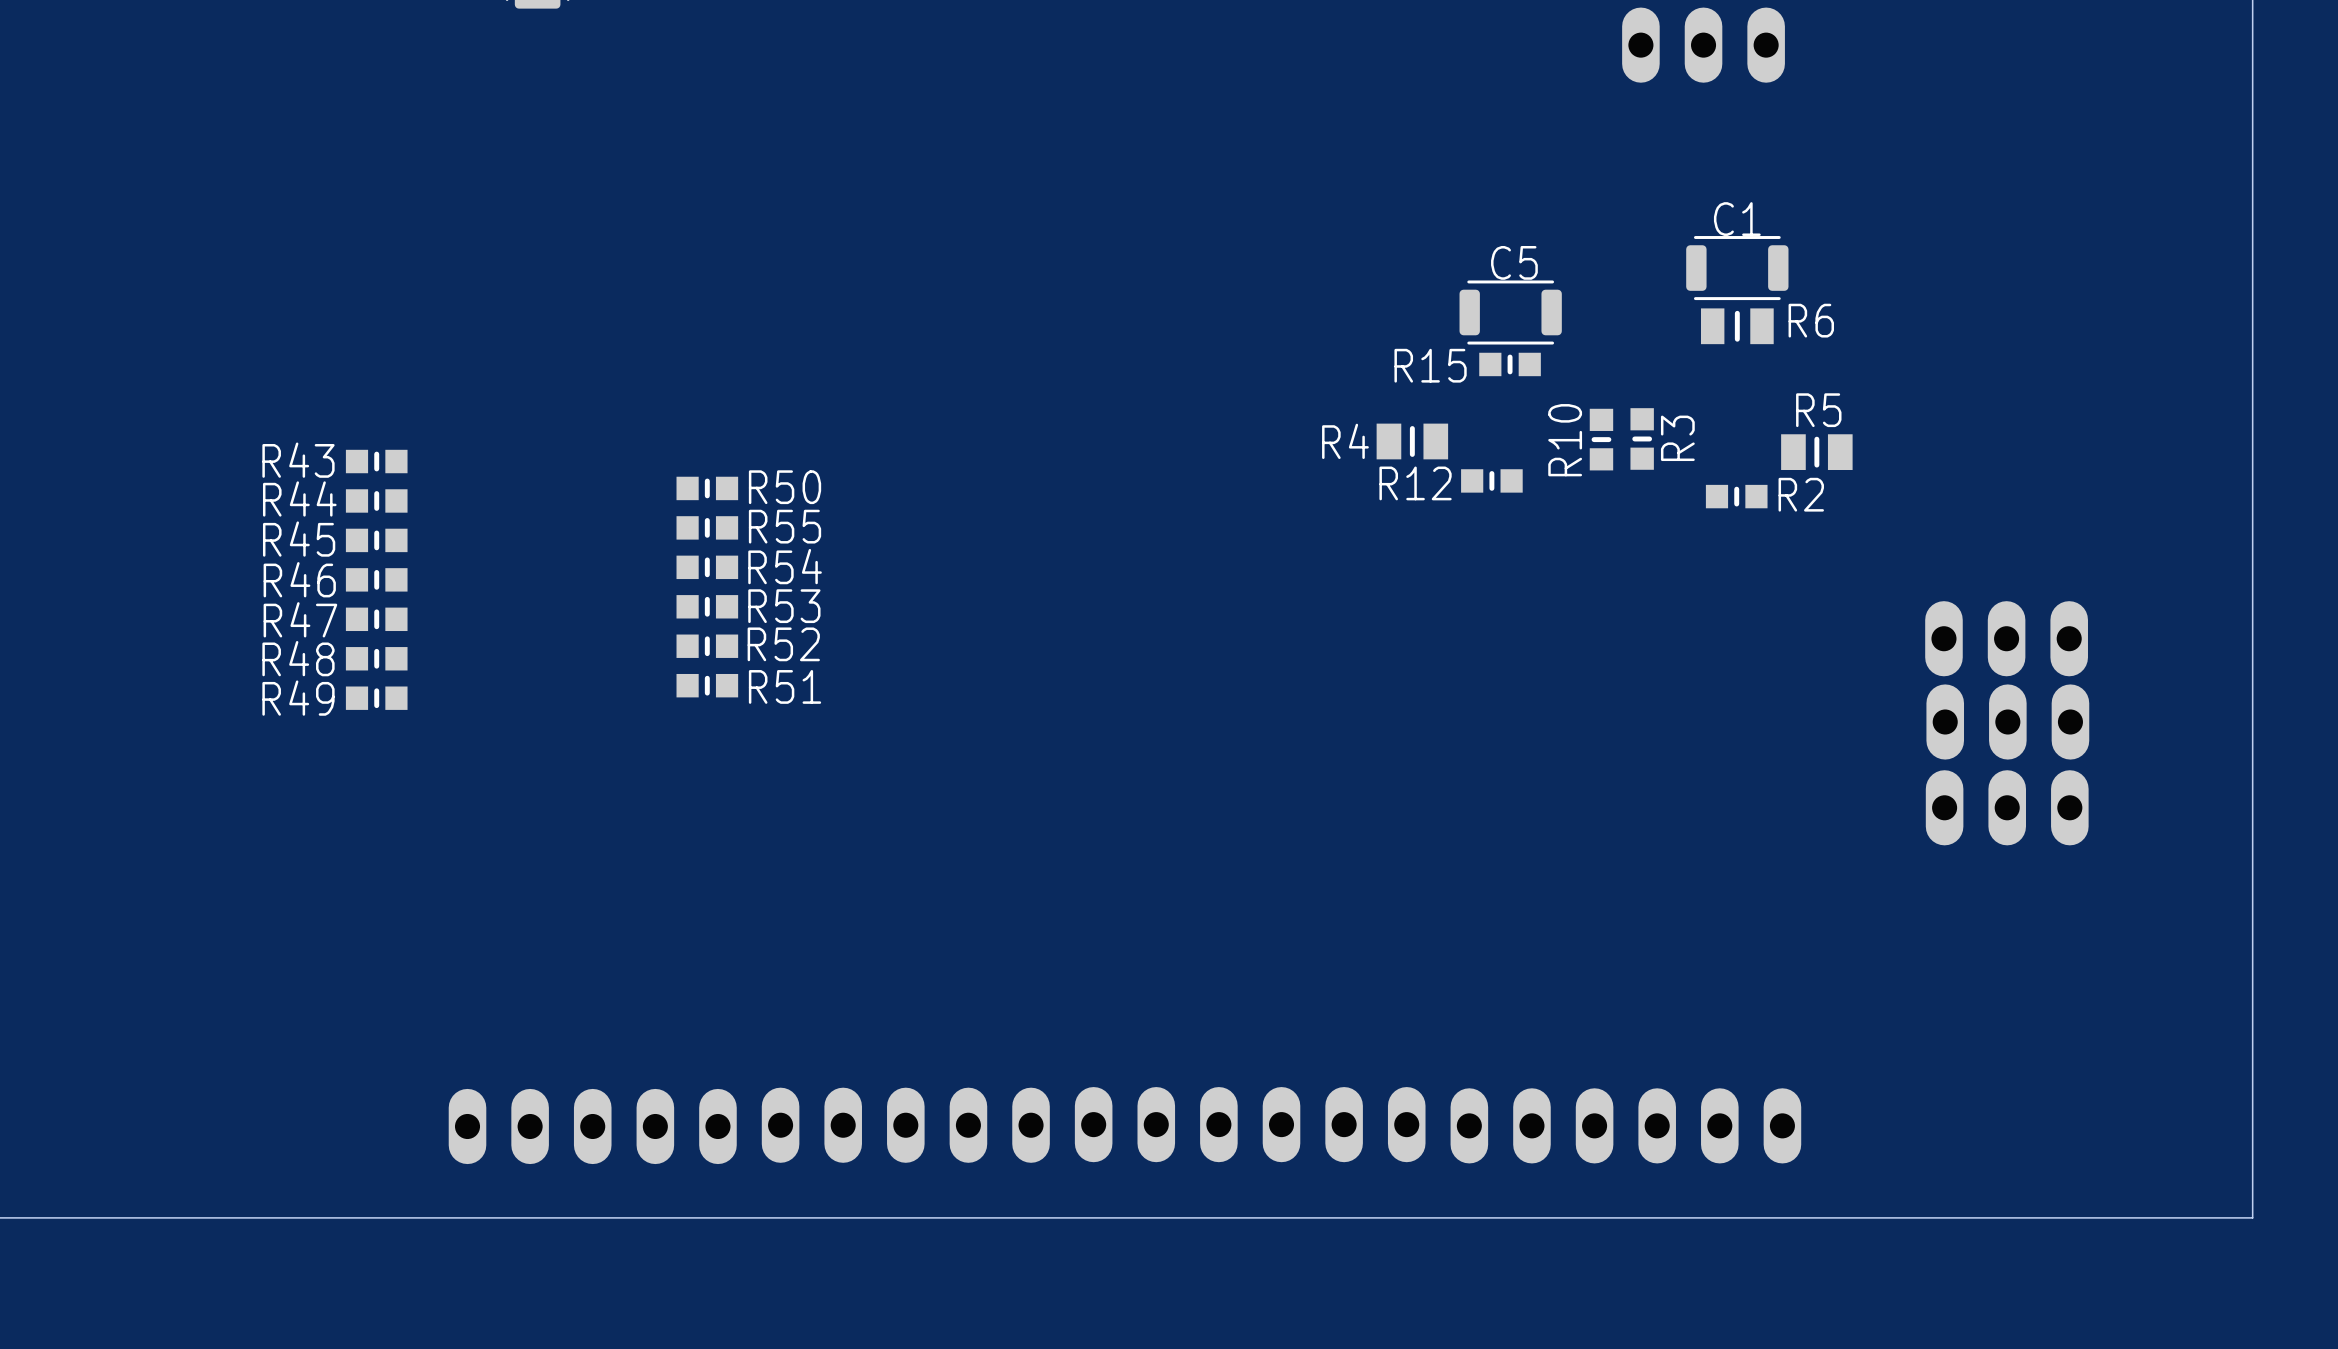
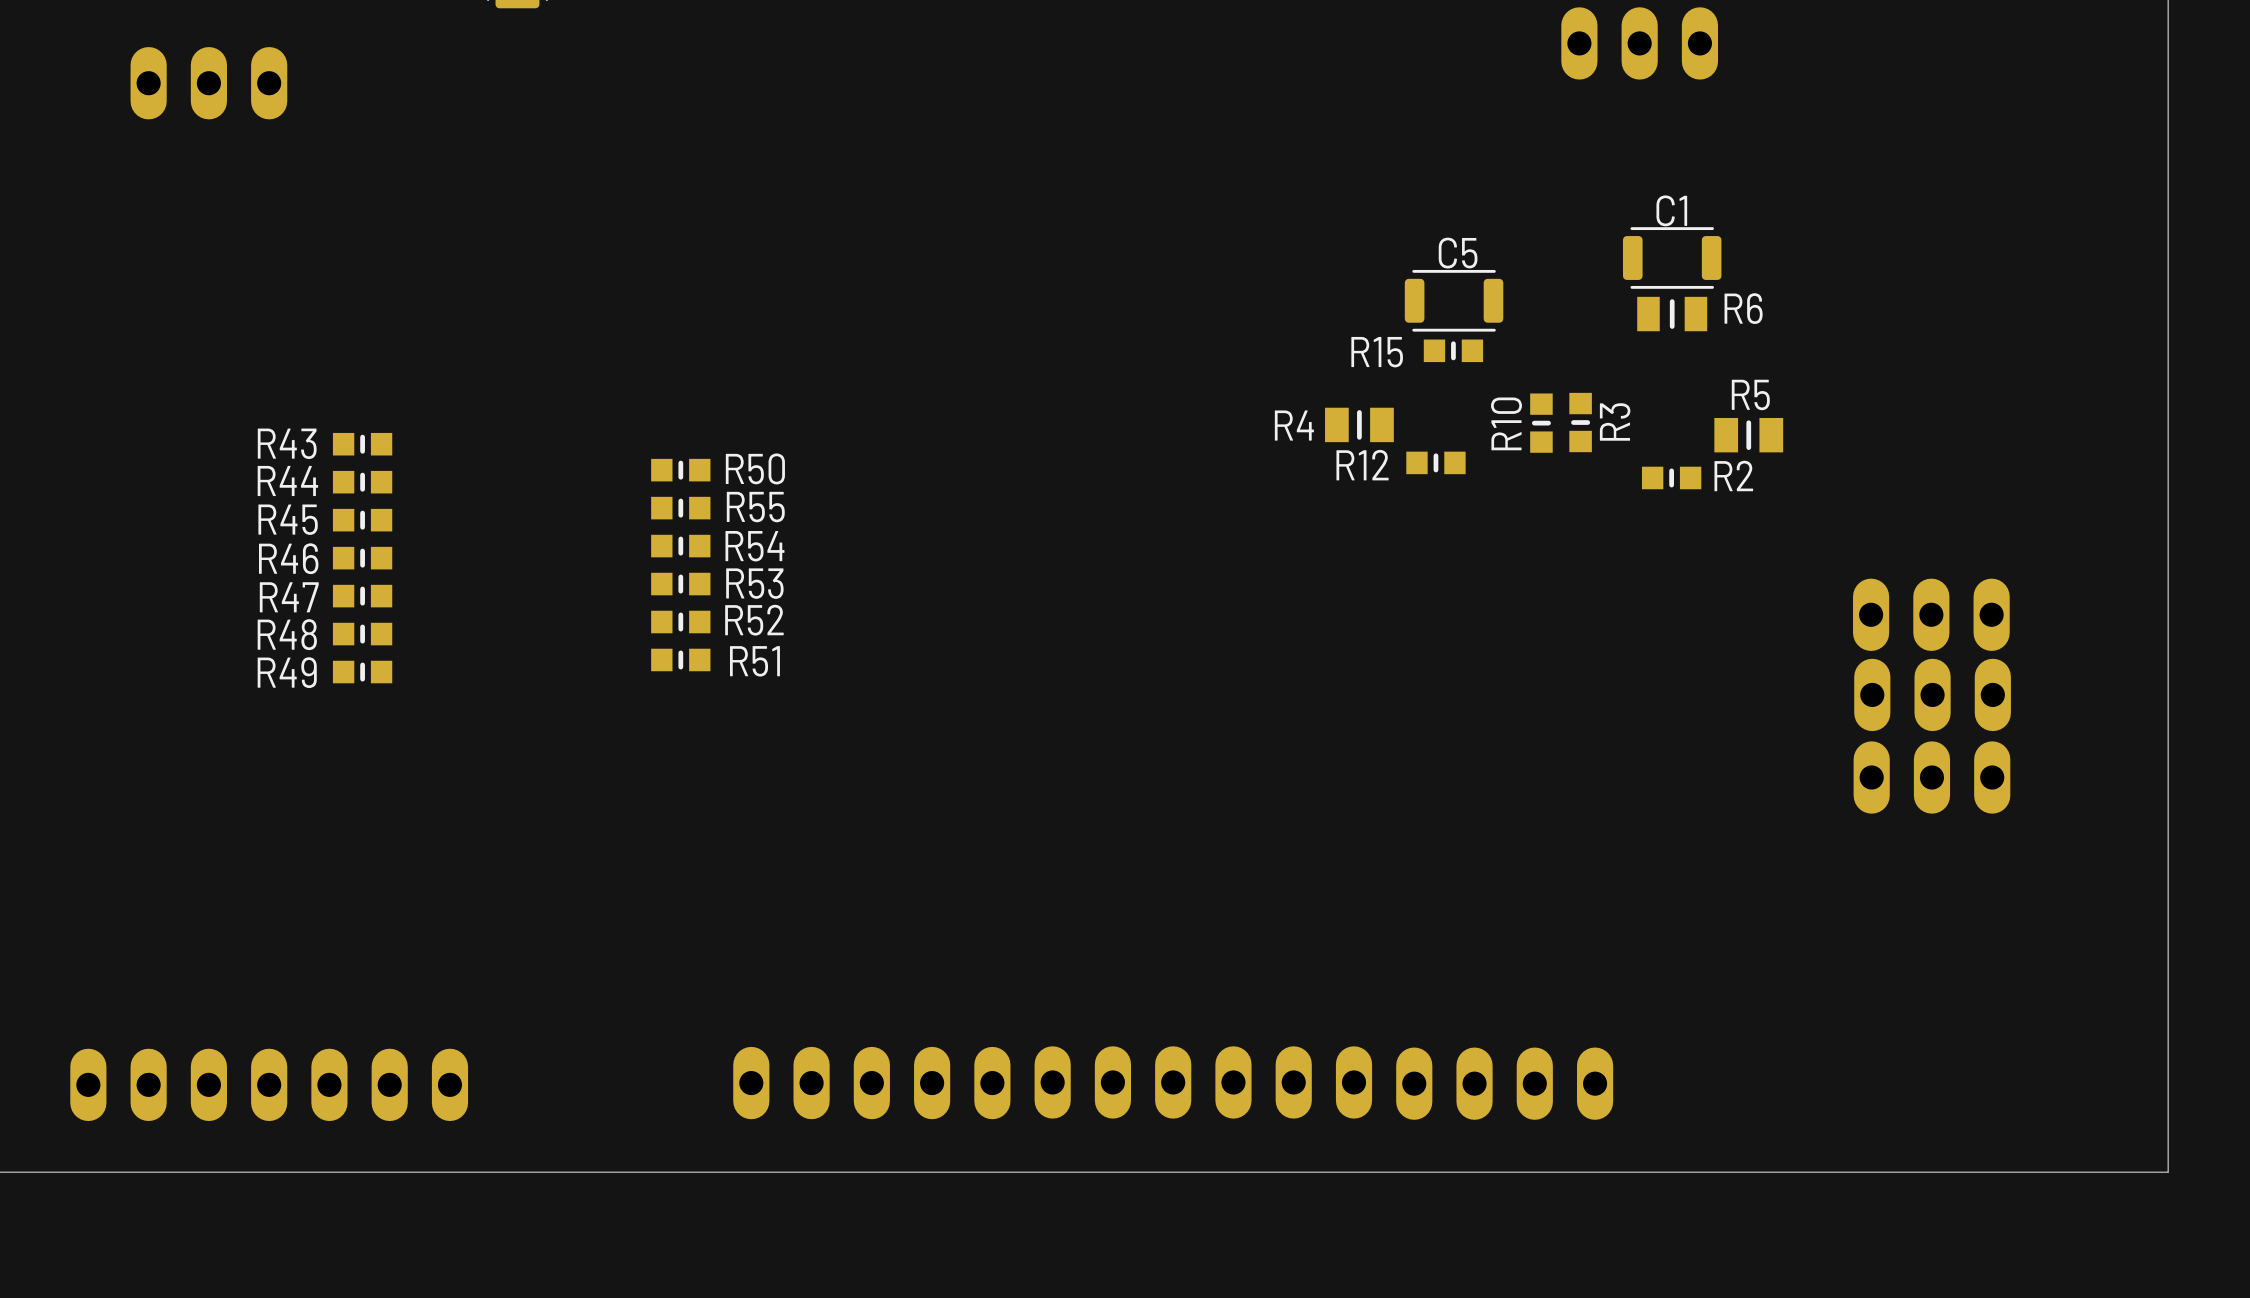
part: none -> (208, 83)
part: (1751, 1125) -> none
part: (592, 1126) -> none
part: none -> (269, 1084)

